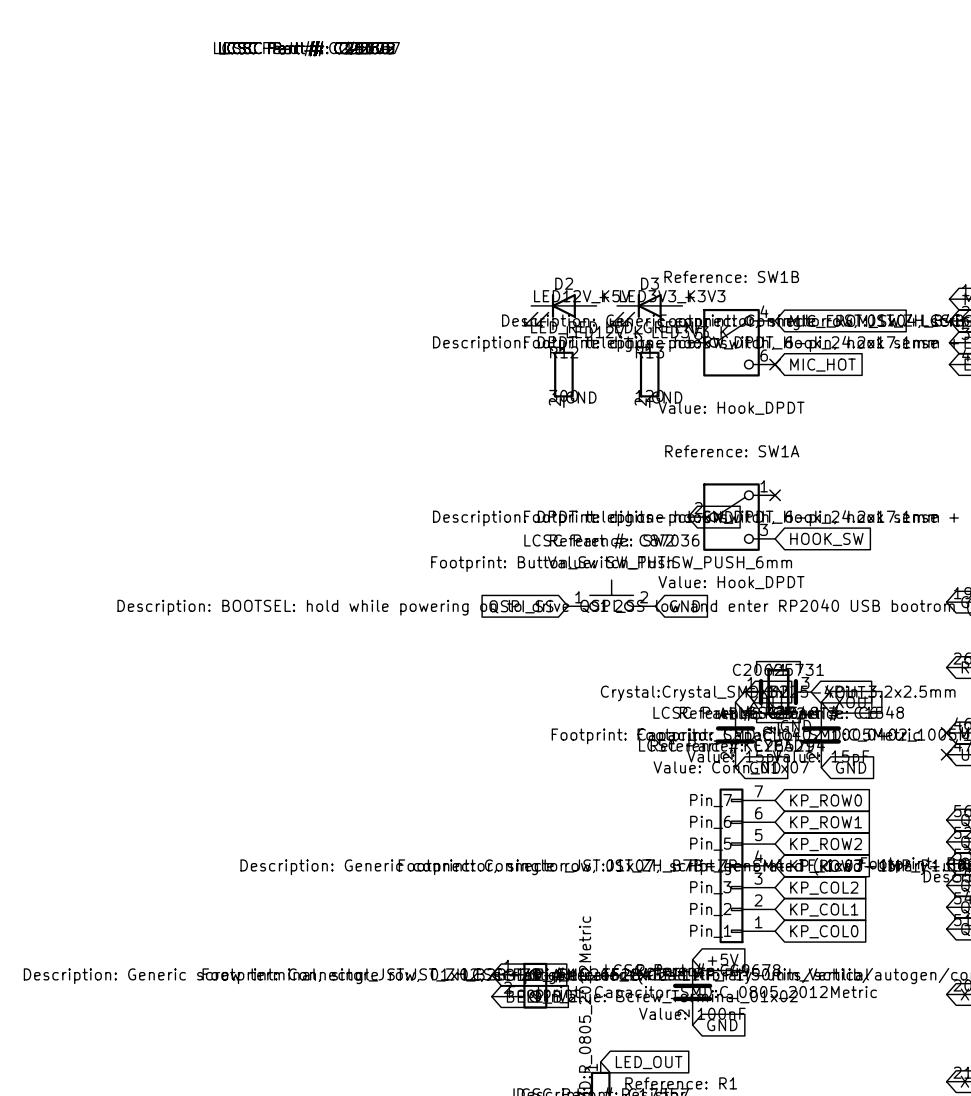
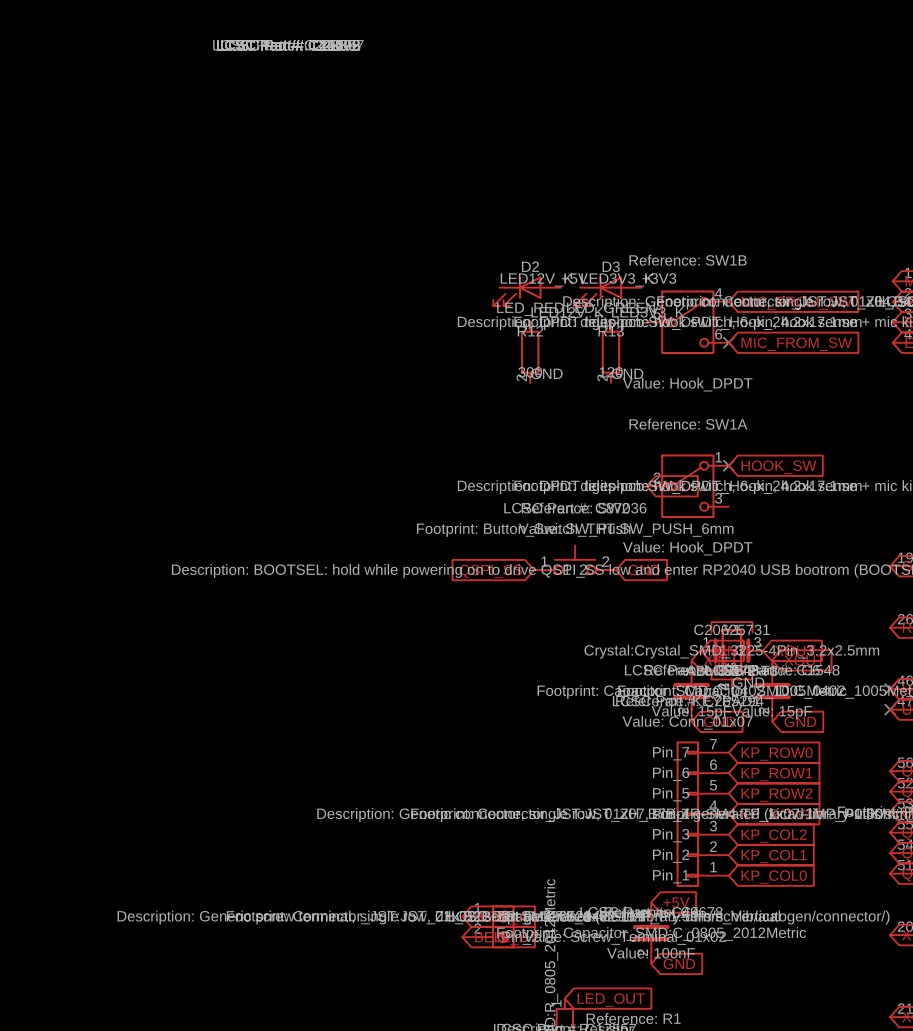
global label: MIC_HOT (822, 365) -> MIC_FROM_SW (796, 344)
global label position: HOOK_SW (826, 539) -> HOOK_SW (779, 467)

